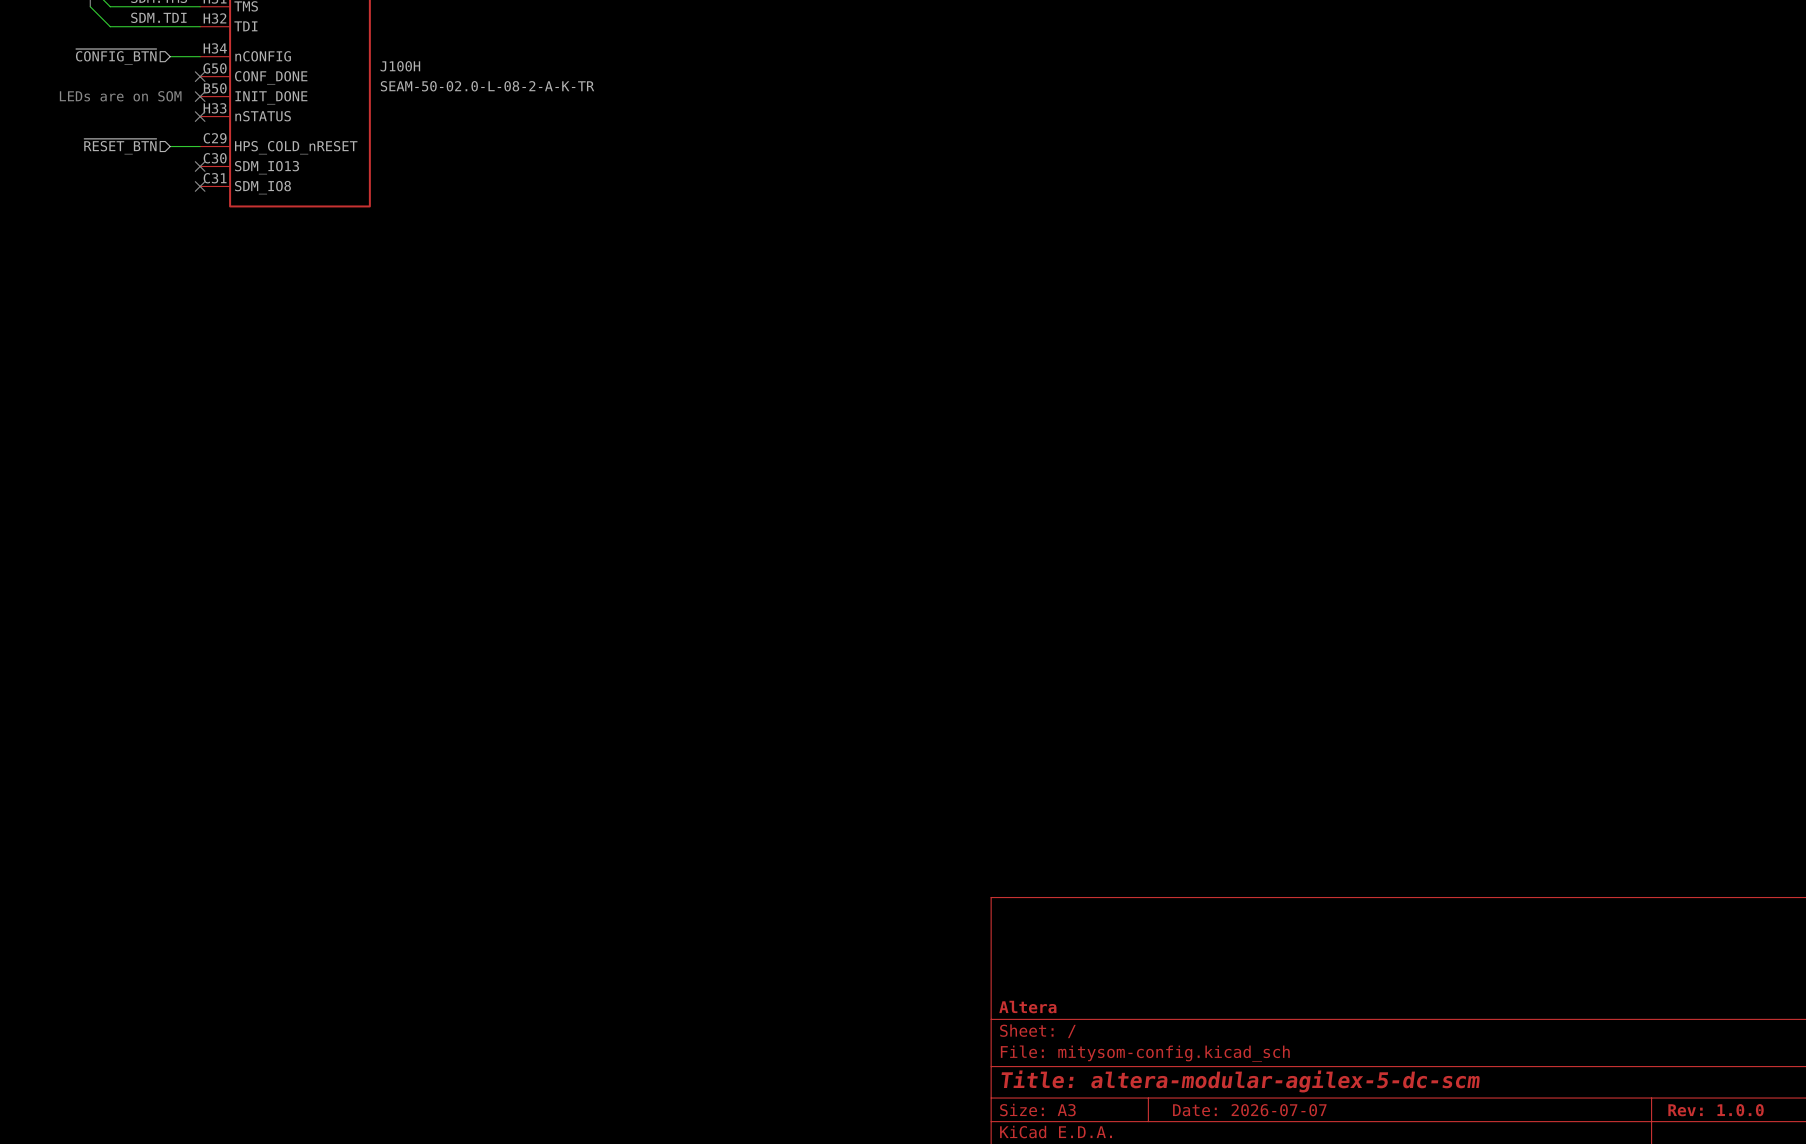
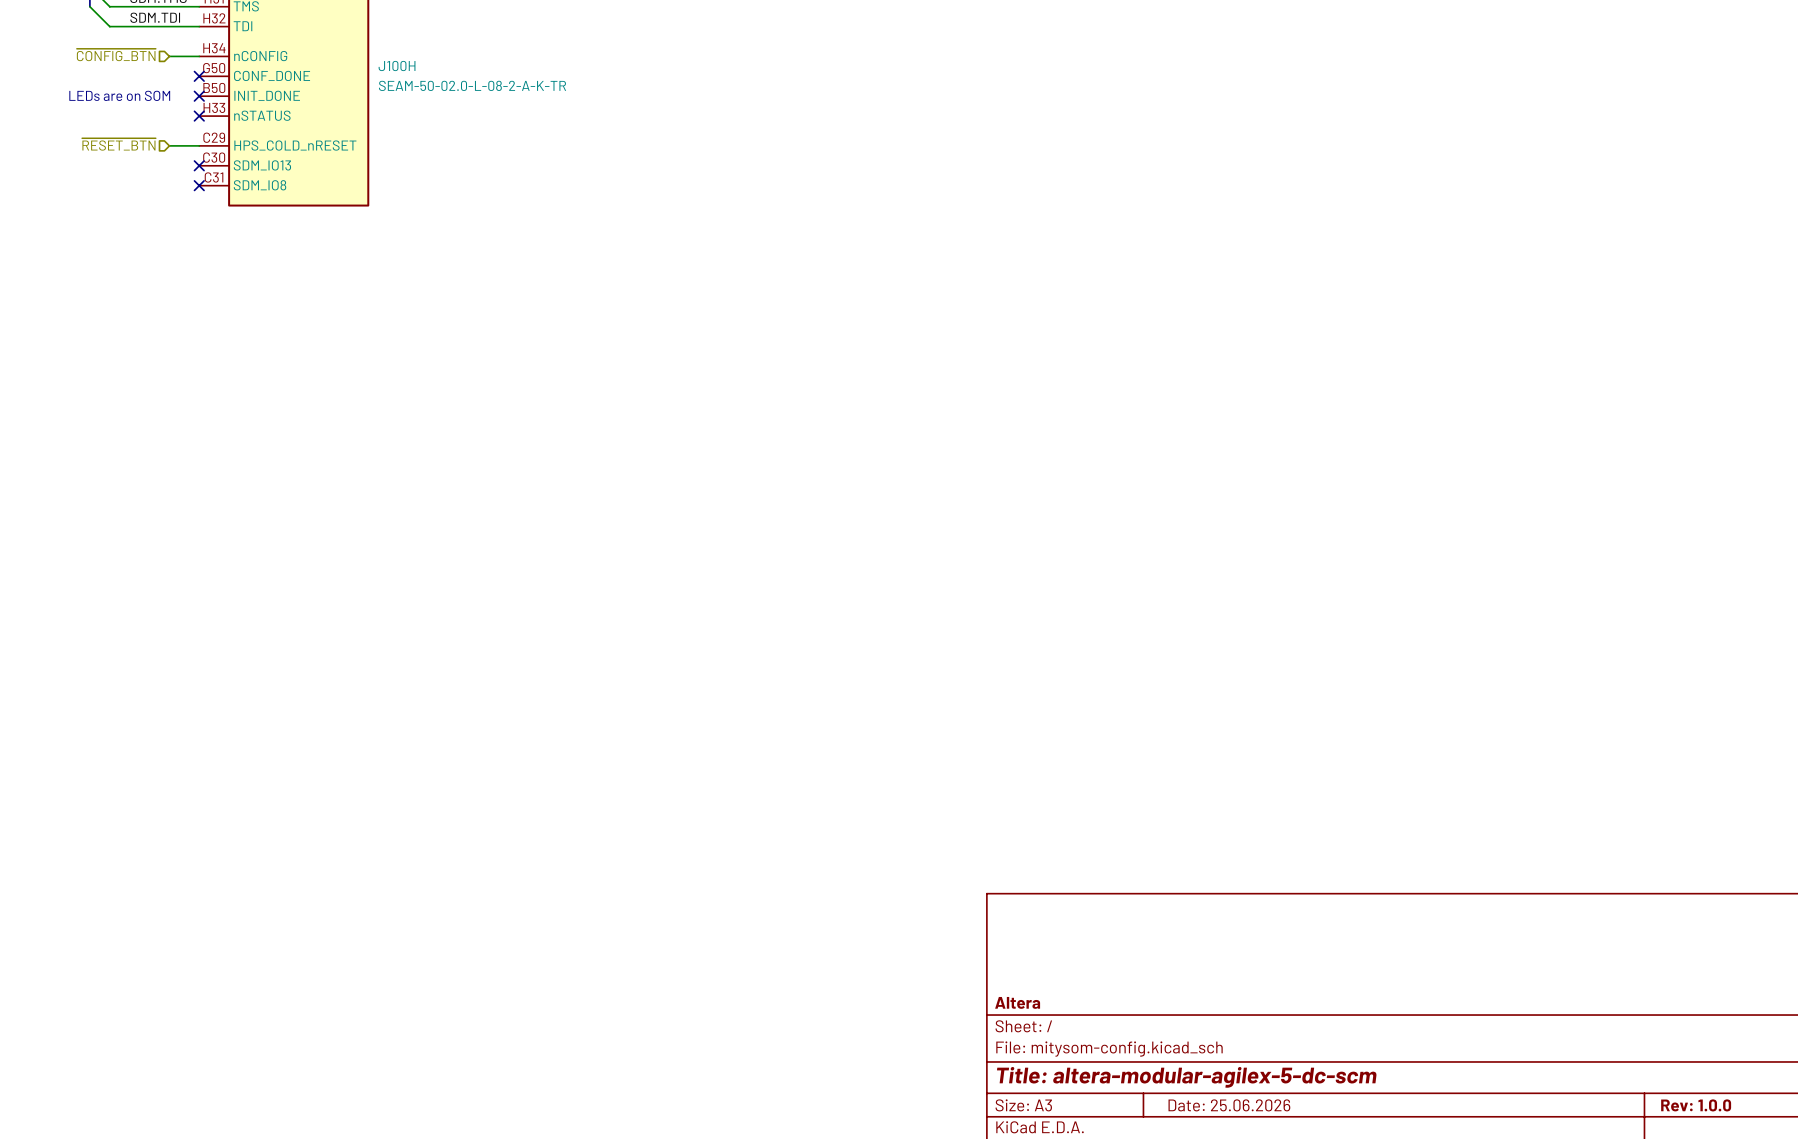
title block: Date: 2026-07-07 (1249, 1110) -> Date: 25.06.2026 (1229, 1105)

